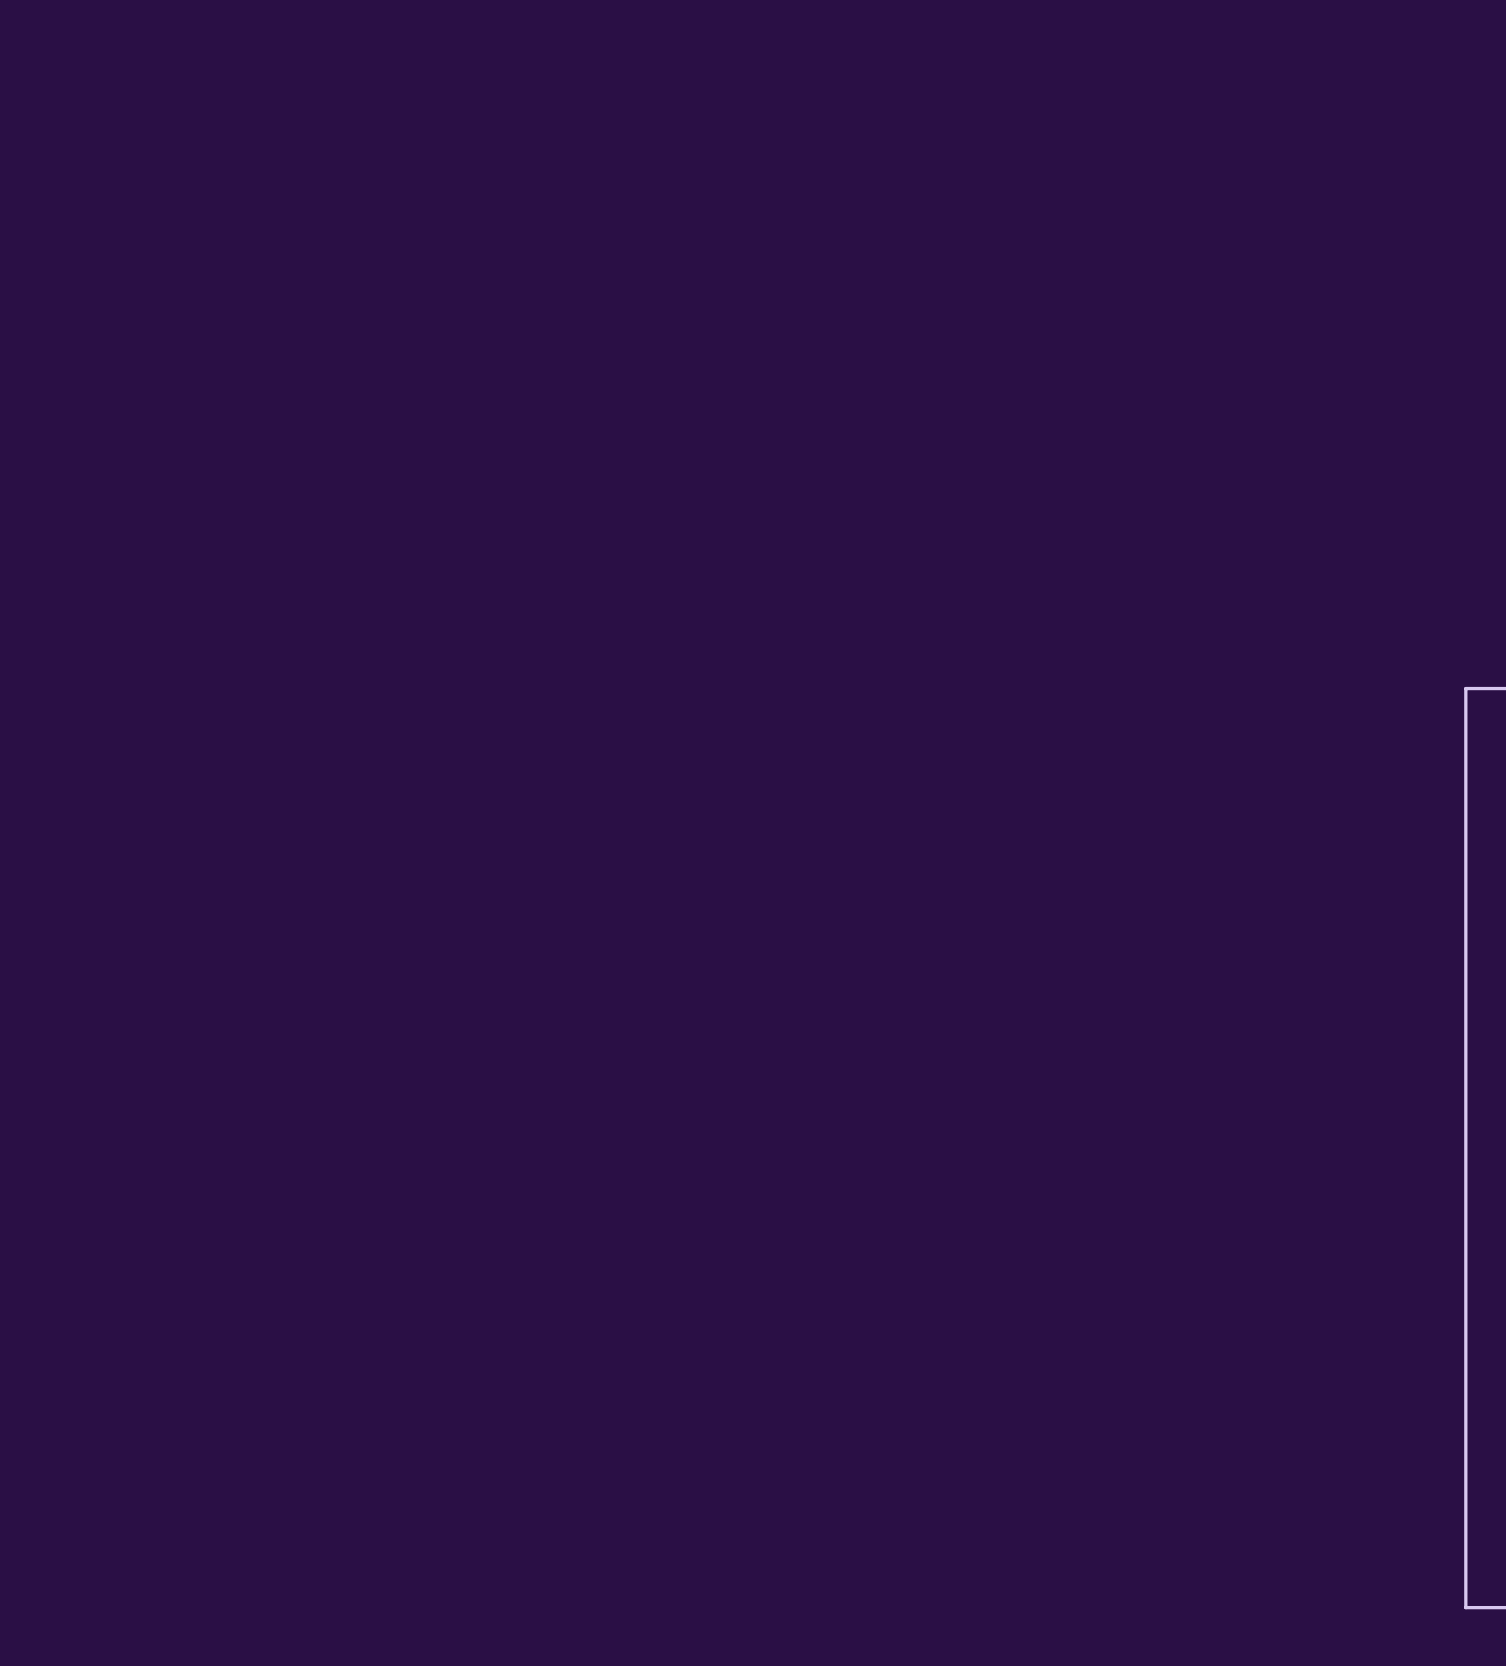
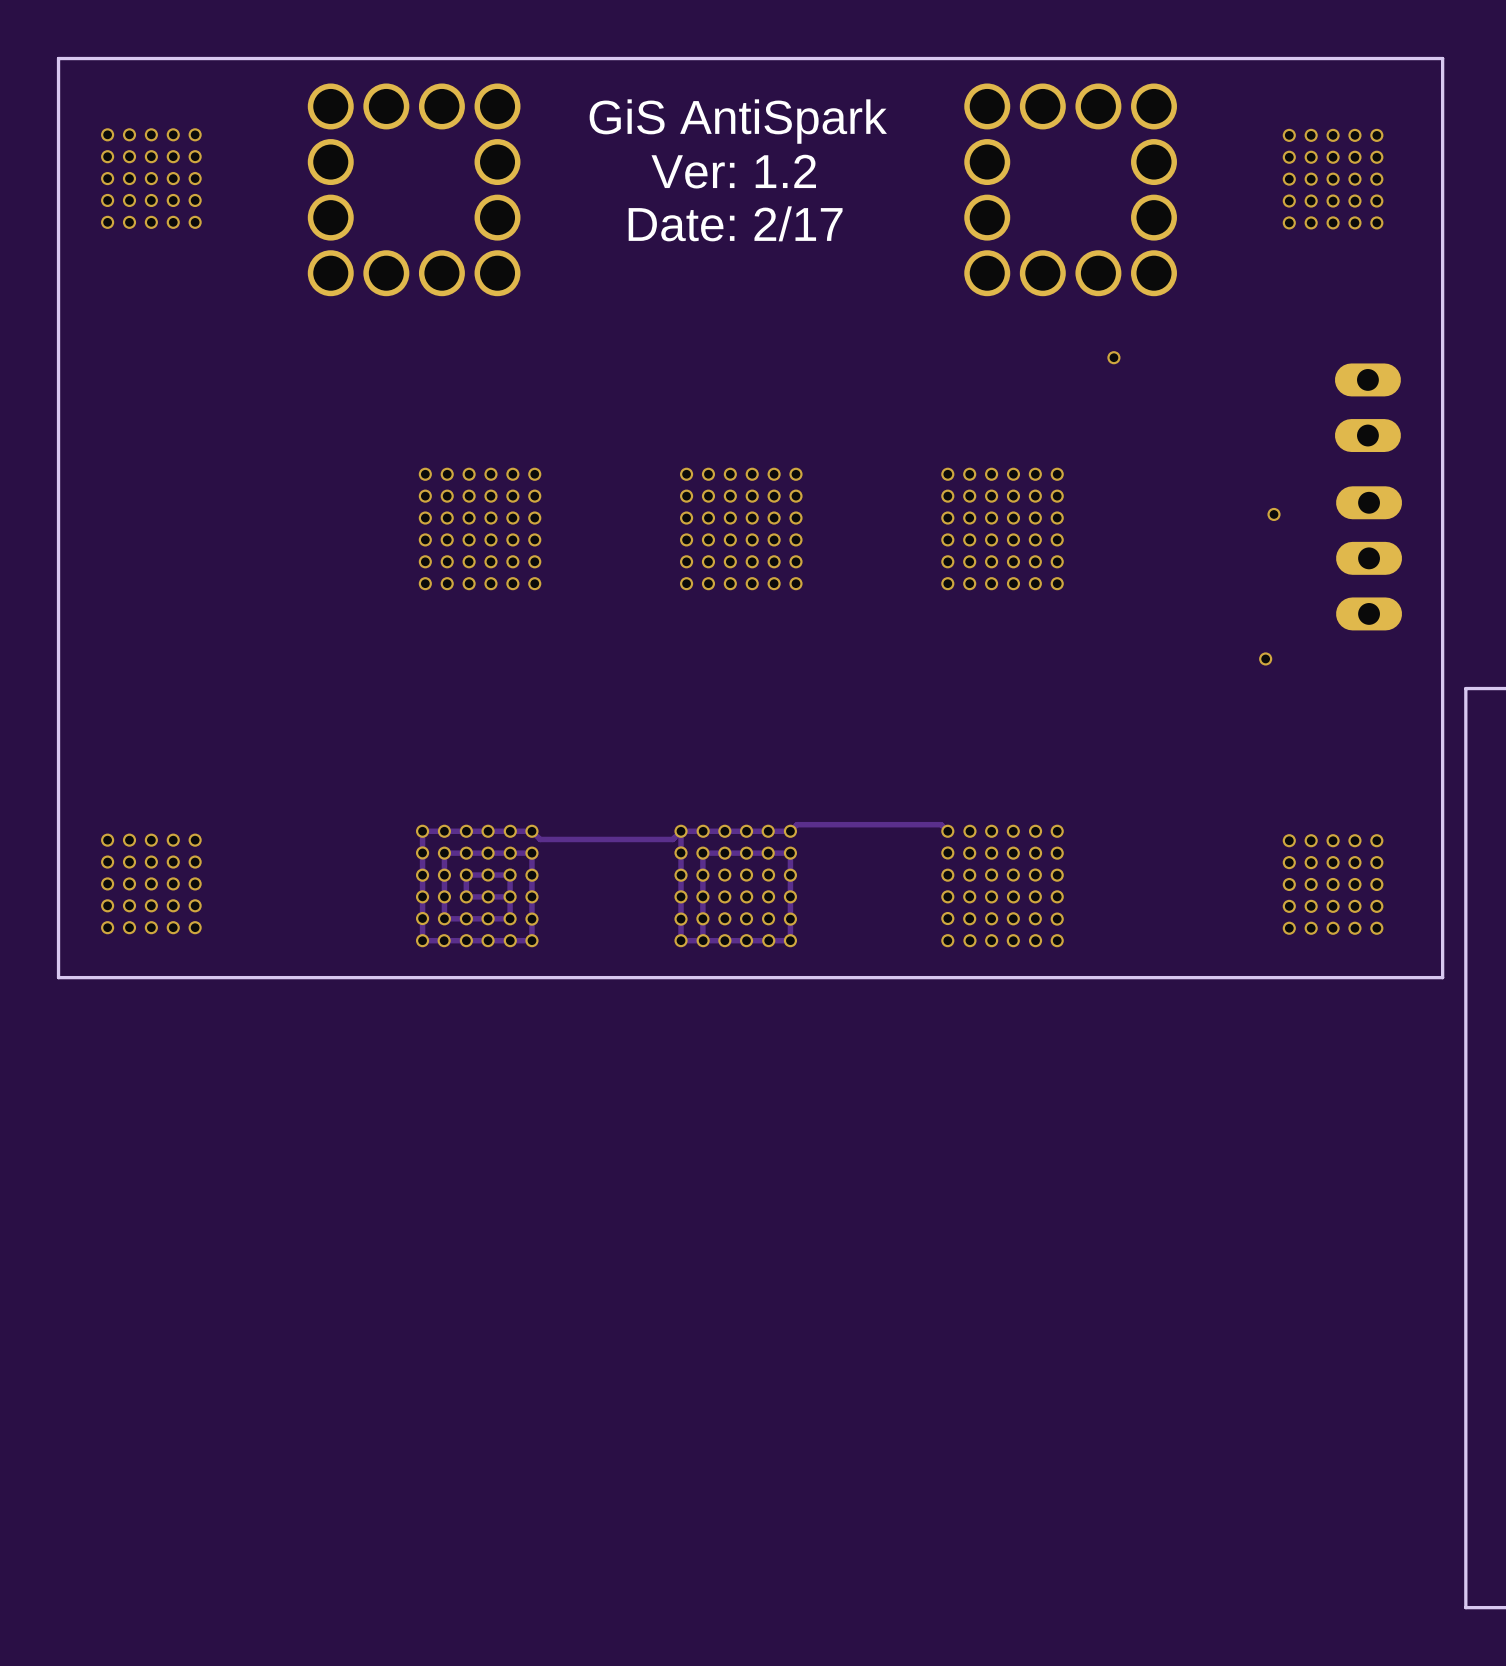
board edge: none -> (1442, 58) (58, 58) (58, 977) (1442, 977) (1442, 58)
text: none -> GiS AntiSpark (738, 121)
via: none -> (107, 134)
via: none -> (129, 134)
via: none -> (151, 134)
via: none -> (173, 134)
via: none -> (195, 134)
via: none -> (1289, 135)
via: none -> (1311, 135)
via: none -> (1333, 135)
via: none -> (1354, 135)
via: none -> (1376, 135)
via: none -> (107, 156)
via: none -> (129, 156)
via: none -> (151, 156)
via: none -> (173, 156)
via: none -> (195, 156)
via: none -> (1289, 157)
via: none -> (1311, 157)
via: none -> (1333, 157)
via: none -> (1354, 157)
via: none -> (1376, 157)
text: none -> Ver: 1.2 (733, 171)
via: none -> (107, 178)
via: none -> (129, 178)
via: none -> (151, 178)
via: none -> (173, 178)
via: none -> (195, 178)
via: none -> (1289, 179)
via: none -> (1311, 179)
via: none -> (1333, 179)
via: none -> (1354, 179)
via: none -> (1376, 179)
part: none -> (414, 189)
part: none -> (1070, 189)
via: none -> (107, 200)
via: none -> (129, 200)
via: none -> (151, 200)
via: none -> (173, 200)
via: none -> (195, 200)
via: none -> (1289, 201)
via: none -> (1311, 201)
via: none -> (1333, 201)
via: none -> (1354, 201)
via: none -> (1376, 201)
via: none -> (107, 222)
via: none -> (129, 222)
via: none -> (151, 222)
via: none -> (173, 222)
via: none -> (195, 222)
via: none -> (1289, 222)
via: none -> (1311, 222)
via: none -> (1333, 222)
via: none -> (1354, 222)
via: none -> (1376, 222)
text: none -> Date: 2/17 (735, 223)
via: none -> (1113, 357)
part: none -> (1367, 407)
via: none -> (425, 474)
via: none -> (447, 474)
via: none -> (469, 474)
via: none -> (490, 474)
via: none -> (512, 474)
via: none -> (534, 474)
via: none -> (686, 474)
via: none -> (708, 474)
via: none -> (730, 474)
via: none -> (752, 474)
via: none -> (774, 474)
via: none -> (795, 474)
via: none -> (947, 474)
via: none -> (969, 474)
via: none -> (991, 474)
via: none -> (1013, 474)
via: none -> (1035, 474)
via: none -> (1057, 474)
via: none -> (425, 496)
via: none -> (447, 496)
via: none -> (469, 496)
via: none -> (490, 496)
via: none -> (512, 496)
via: none -> (534, 496)
via: none -> (686, 496)
via: none -> (708, 496)
via: none -> (730, 496)
via: none -> (752, 496)
via: none -> (774, 496)
via: none -> (795, 496)
via: none -> (947, 496)
via: none -> (969, 496)
via: none -> (991, 496)
via: none -> (1013, 496)
via: none -> (1035, 496)
via: none -> (1057, 496)
via: none -> (1274, 514)
via: none -> (425, 518)
via: none -> (447, 518)
via: none -> (469, 518)
via: none -> (490, 518)
via: none -> (512, 518)
via: none -> (534, 518)
via: none -> (686, 518)
via: none -> (708, 518)
via: none -> (730, 518)
via: none -> (752, 518)
via: none -> (774, 518)
via: none -> (795, 518)
via: none -> (947, 518)
via: none -> (969, 518)
via: none -> (991, 518)
via: none -> (1013, 518)
via: none -> (1035, 518)
via: none -> (1057, 518)
via: none -> (425, 539)
via: none -> (447, 539)
via: none -> (469, 539)
via: none -> (490, 539)
via: none -> (512, 539)
via: none -> (534, 539)
via: none -> (686, 539)
via: none -> (708, 539)
via: none -> (730, 539)
via: none -> (752, 539)
via: none -> (774, 539)
via: none -> (795, 539)
via: none -> (947, 539)
via: none -> (969, 539)
via: none -> (991, 539)
via: none -> (1013, 539)
via: none -> (1035, 539)
via: none -> (1057, 539)
part: none -> (1369, 558)
via: none -> (425, 561)
via: none -> (447, 561)
via: none -> (469, 561)
via: none -> (490, 561)
via: none -> (512, 561)
via: none -> (534, 561)
via: none -> (686, 561)
via: none -> (708, 561)
via: none -> (730, 561)
via: none -> (752, 561)
via: none -> (774, 561)
via: none -> (795, 561)
via: none -> (947, 561)
via: none -> (969, 561)
via: none -> (991, 561)
via: none -> (1013, 561)
via: none -> (1035, 561)
via: none -> (1057, 561)
via: none -> (425, 583)
via: none -> (447, 583)
via: none -> (469, 583)
via: none -> (490, 583)
via: none -> (512, 583)
via: none -> (534, 583)
via: none -> (686, 583)
via: none -> (708, 583)
via: none -> (730, 583)
via: none -> (752, 583)
via: none -> (774, 583)
via: none -> (795, 583)
via: none -> (947, 583)
via: none -> (969, 583)
via: none -> (991, 583)
via: none -> (1013, 583)
via: none -> (1035, 583)
via: none -> (1057, 583)
via: none -> (1265, 658)
via: none -> (422, 831)
via: none -> (444, 831)
via: none -> (466, 831)
via: none -> (488, 831)
via: none -> (510, 831)
via: none -> (531, 831)
track: none -> (681, 831) (681, 940) (790, 940) (790, 853) (702, 853) (702, 940)
track: none -> (681, 831) (672, 839) (540, 839) (531, 831) (422, 831) (422, 940) (531, 940) (531, 853) (444, 853) (444, 918) (510, 918) (510, 875) (466, 875) (466, 896) (510, 896)
via: none -> (681, 831)
via: none -> (703, 831)
via: none -> (724, 831)
via: none -> (746, 831)
via: none -> (768, 831)
via: none -> (790, 831)
track: none -> (947, 831) (941, 824) (797, 824) (790, 831) (681, 831)
via: none -> (947, 831)
via: none -> (969, 831)
via: none -> (991, 831)
via: none -> (1013, 831)
via: none -> (1035, 831)
via: none -> (1057, 831)
via: none -> (107, 840)
via: none -> (129, 840)
via: none -> (151, 840)
via: none -> (173, 840)
via: none -> (195, 840)
via: none -> (1289, 840)
via: none -> (1311, 840)
via: none -> (1333, 840)
via: none -> (1354, 840)
via: none -> (1376, 840)
via: none -> (422, 852)
via: none -> (681, 852)
via: none -> (947, 852)
via: none -> (444, 853)
via: none -> (466, 853)
via: none -> (488, 853)
via: none -> (510, 853)
via: none -> (531, 853)
via: none -> (702, 853)
via: none -> (724, 853)
via: none -> (746, 853)
via: none -> (768, 853)
via: none -> (790, 853)
via: none -> (969, 853)
via: none -> (991, 853)
via: none -> (1013, 853)
via: none -> (1035, 853)
via: none -> (1057, 853)
via: none -> (107, 862)
via: none -> (129, 862)
via: none -> (151, 862)
via: none -> (173, 862)
via: none -> (195, 862)
via: none -> (1289, 862)
via: none -> (1311, 862)
via: none -> (1333, 862)
via: none -> (1354, 862)
via: none -> (1376, 862)
via: none -> (422, 875)
via: none -> (444, 875)
via: none -> (466, 875)
via: none -> (488, 875)
via: none -> (510, 875)
via: none -> (531, 875)
via: none -> (681, 875)
via: none -> (702, 875)
via: none -> (724, 875)
via: none -> (746, 875)
via: none -> (768, 875)
via: none -> (790, 875)
via: none -> (947, 875)
via: none -> (969, 875)
via: none -> (991, 875)
via: none -> (1013, 875)
via: none -> (1035, 875)
via: none -> (1057, 875)
via: none -> (107, 883)
via: none -> (129, 883)
via: none -> (151, 883)
via: none -> (173, 883)
via: none -> (195, 883)
via: none -> (1289, 884)
via: none -> (1311, 884)
via: none -> (1333, 884)
via: none -> (1354, 884)
via: none -> (1376, 884)
via: none -> (422, 896)
via: none -> (444, 896)
via: none -> (466, 896)
via: none -> (488, 896)
via: none -> (510, 896)
via: none -> (531, 896)
via: none -> (681, 896)
via: none -> (702, 896)
via: none -> (724, 896)
via: none -> (746, 896)
via: none -> (768, 896)
via: none -> (790, 896)
via: none -> (947, 896)
via: none -> (969, 896)
via: none -> (991, 896)
via: none -> (1013, 896)
via: none -> (1035, 896)
via: none -> (1057, 896)
via: none -> (107, 905)
via: none -> (129, 905)
via: none -> (151, 905)
via: none -> (173, 905)
via: none -> (195, 905)
via: none -> (1289, 906)
via: none -> (1311, 906)
via: none -> (1333, 906)
via: none -> (1354, 906)
via: none -> (1376, 906)
via: none -> (422, 918)
via: none -> (444, 918)
via: none -> (466, 918)
via: none -> (488, 918)
via: none -> (510, 918)
via: none -> (702, 918)
via: none -> (724, 918)
via: none -> (746, 918)
via: none -> (768, 918)
via: none -> (947, 918)
via: none -> (969, 918)
via: none -> (991, 918)
via: none -> (1013, 918)
via: none -> (1035, 918)
via: none -> (531, 919)
via: none -> (681, 919)
via: none -> (790, 919)
via: none -> (1057, 919)
via: none -> (107, 927)
via: none -> (129, 927)
via: none -> (151, 927)
via: none -> (173, 927)
via: none -> (195, 927)
via: none -> (1289, 928)
via: none -> (1311, 928)
via: none -> (1333, 928)
via: none -> (1354, 928)
via: none -> (1376, 928)
via: none -> (422, 940)
via: none -> (444, 940)
via: none -> (466, 940)
via: none -> (488, 940)
via: none -> (510, 940)
via: none -> (531, 940)
via: none -> (681, 940)
via: none -> (703, 940)
via: none -> (724, 940)
via: none -> (746, 940)
via: none -> (768, 940)
via: none -> (790, 940)
via: none -> (947, 940)
via: none -> (969, 940)
via: none -> (991, 940)
via: none -> (1013, 940)
via: none -> (1035, 940)
via: none -> (1057, 940)

